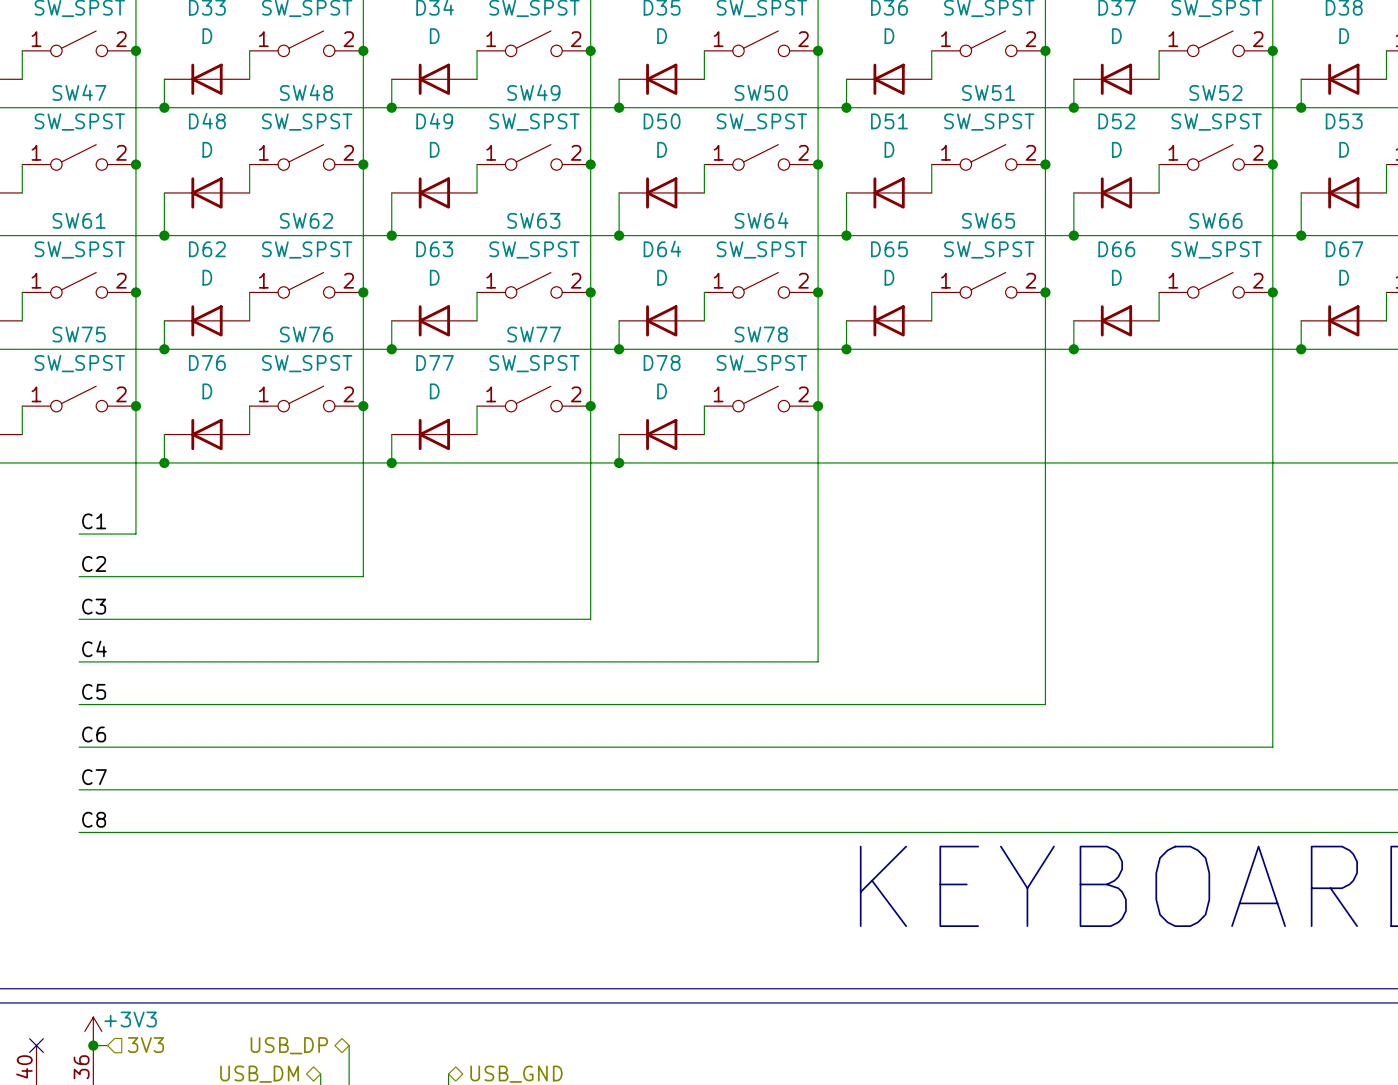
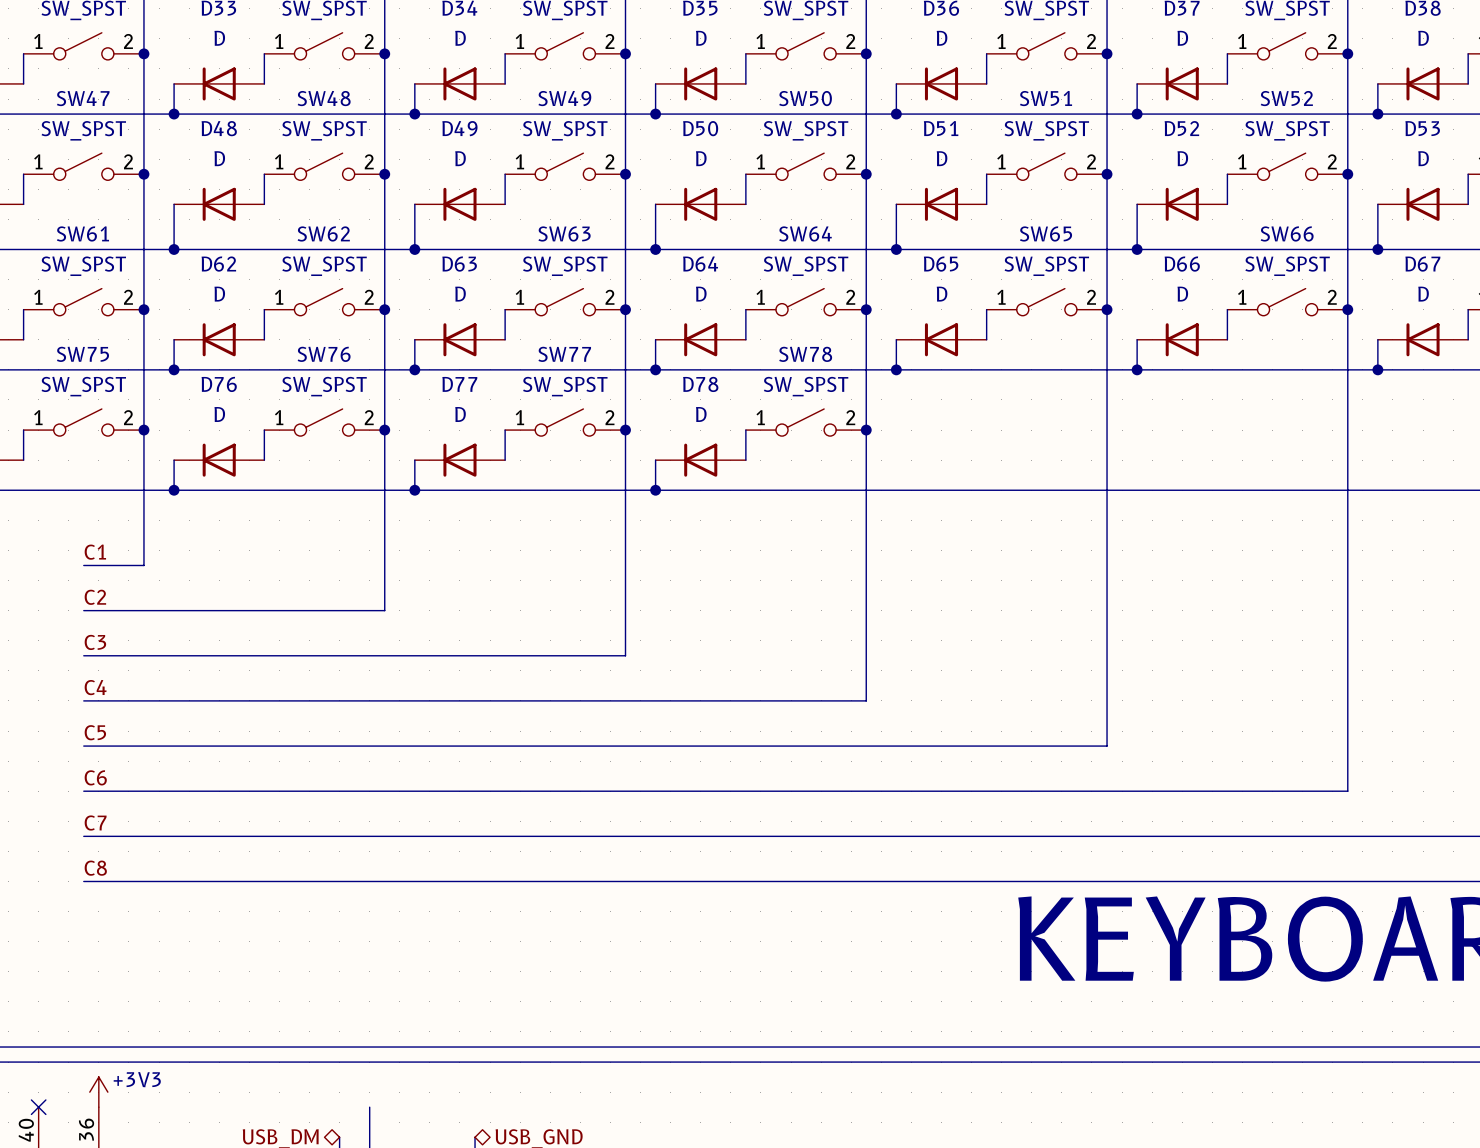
wire: (93, 1045) (107, 1045) -> none
junction: (93, 1045) -> none
hierarchical label: 3V3 (145, 1045) -> none
hierarchical label: USB_DP (289, 1045) -> none

